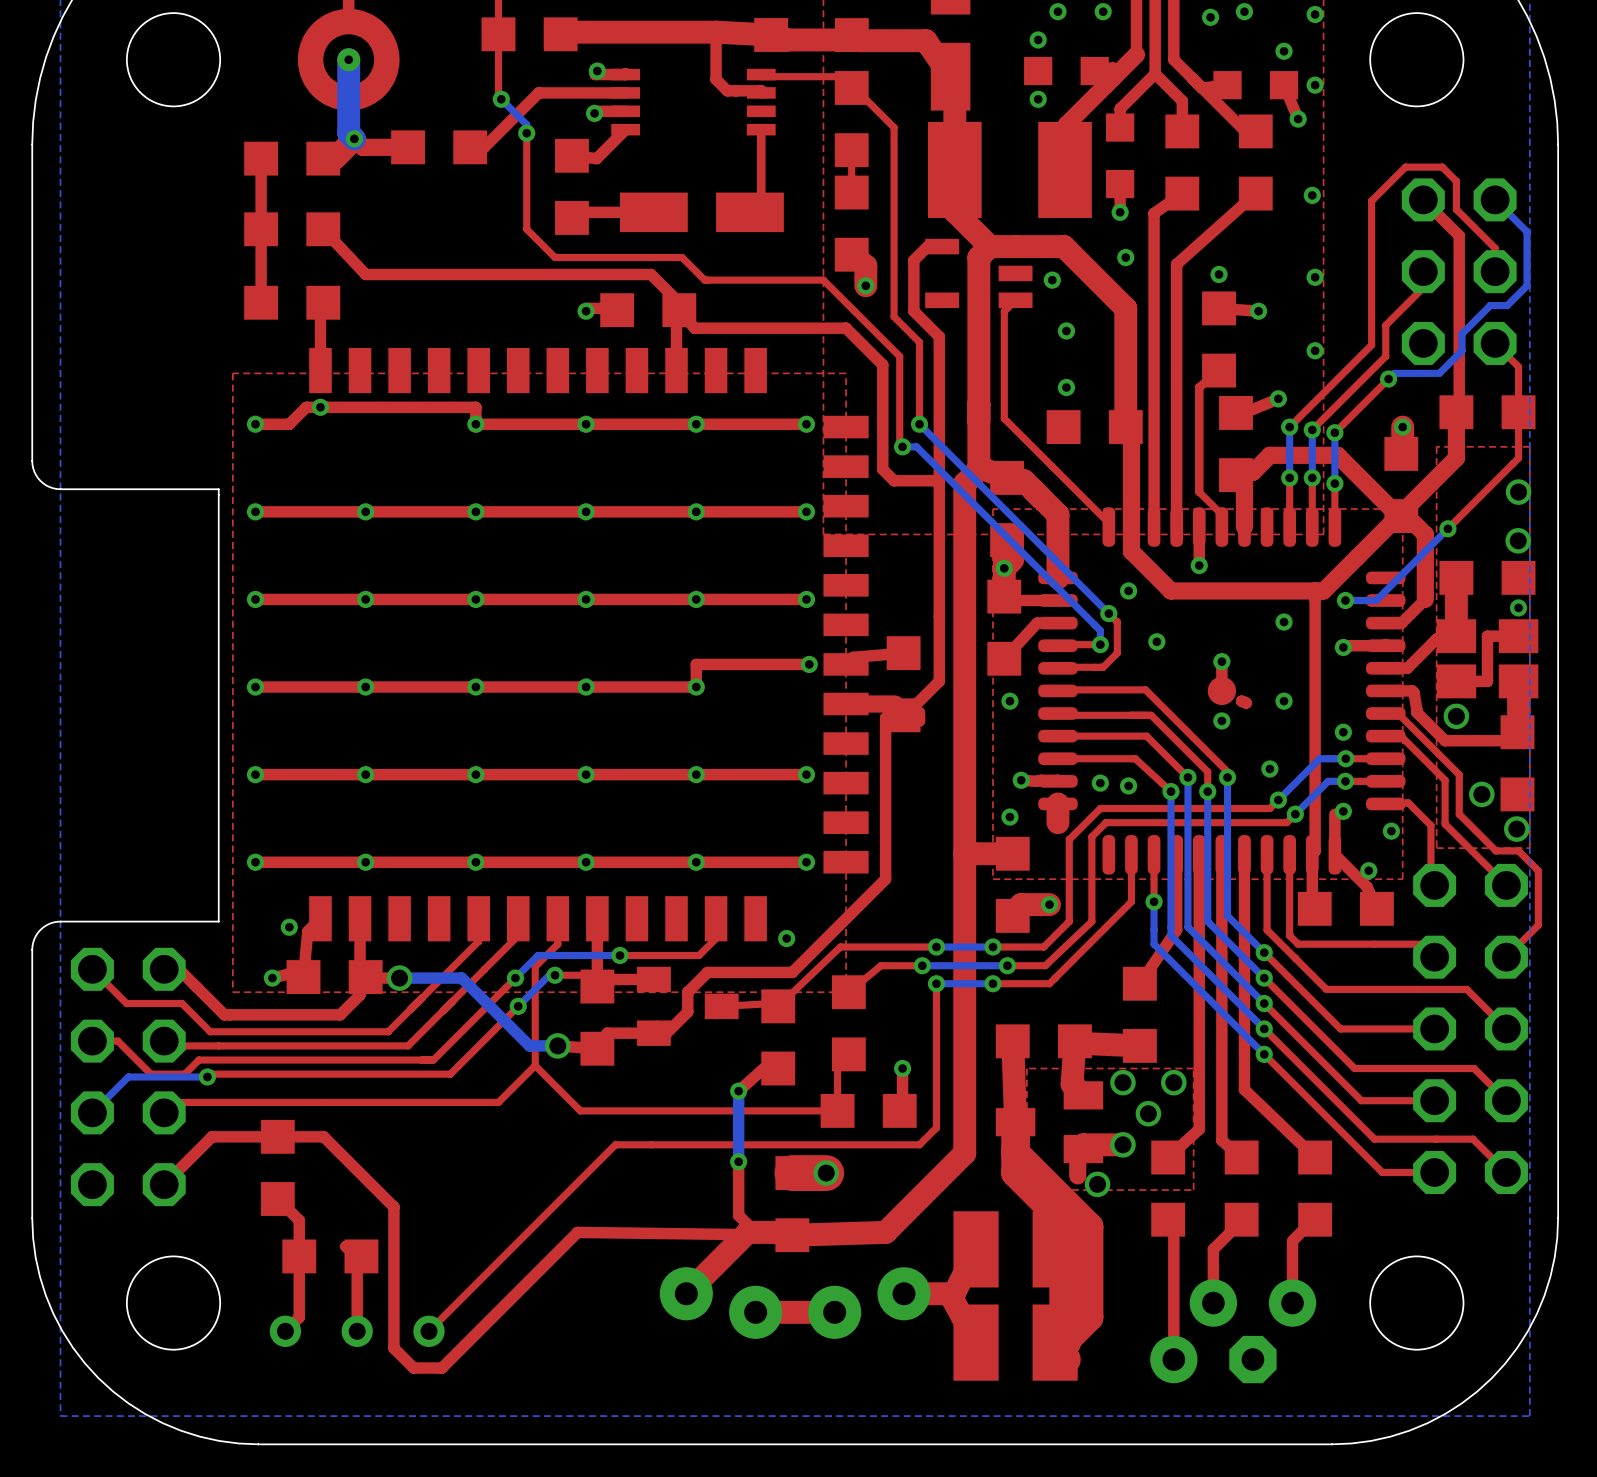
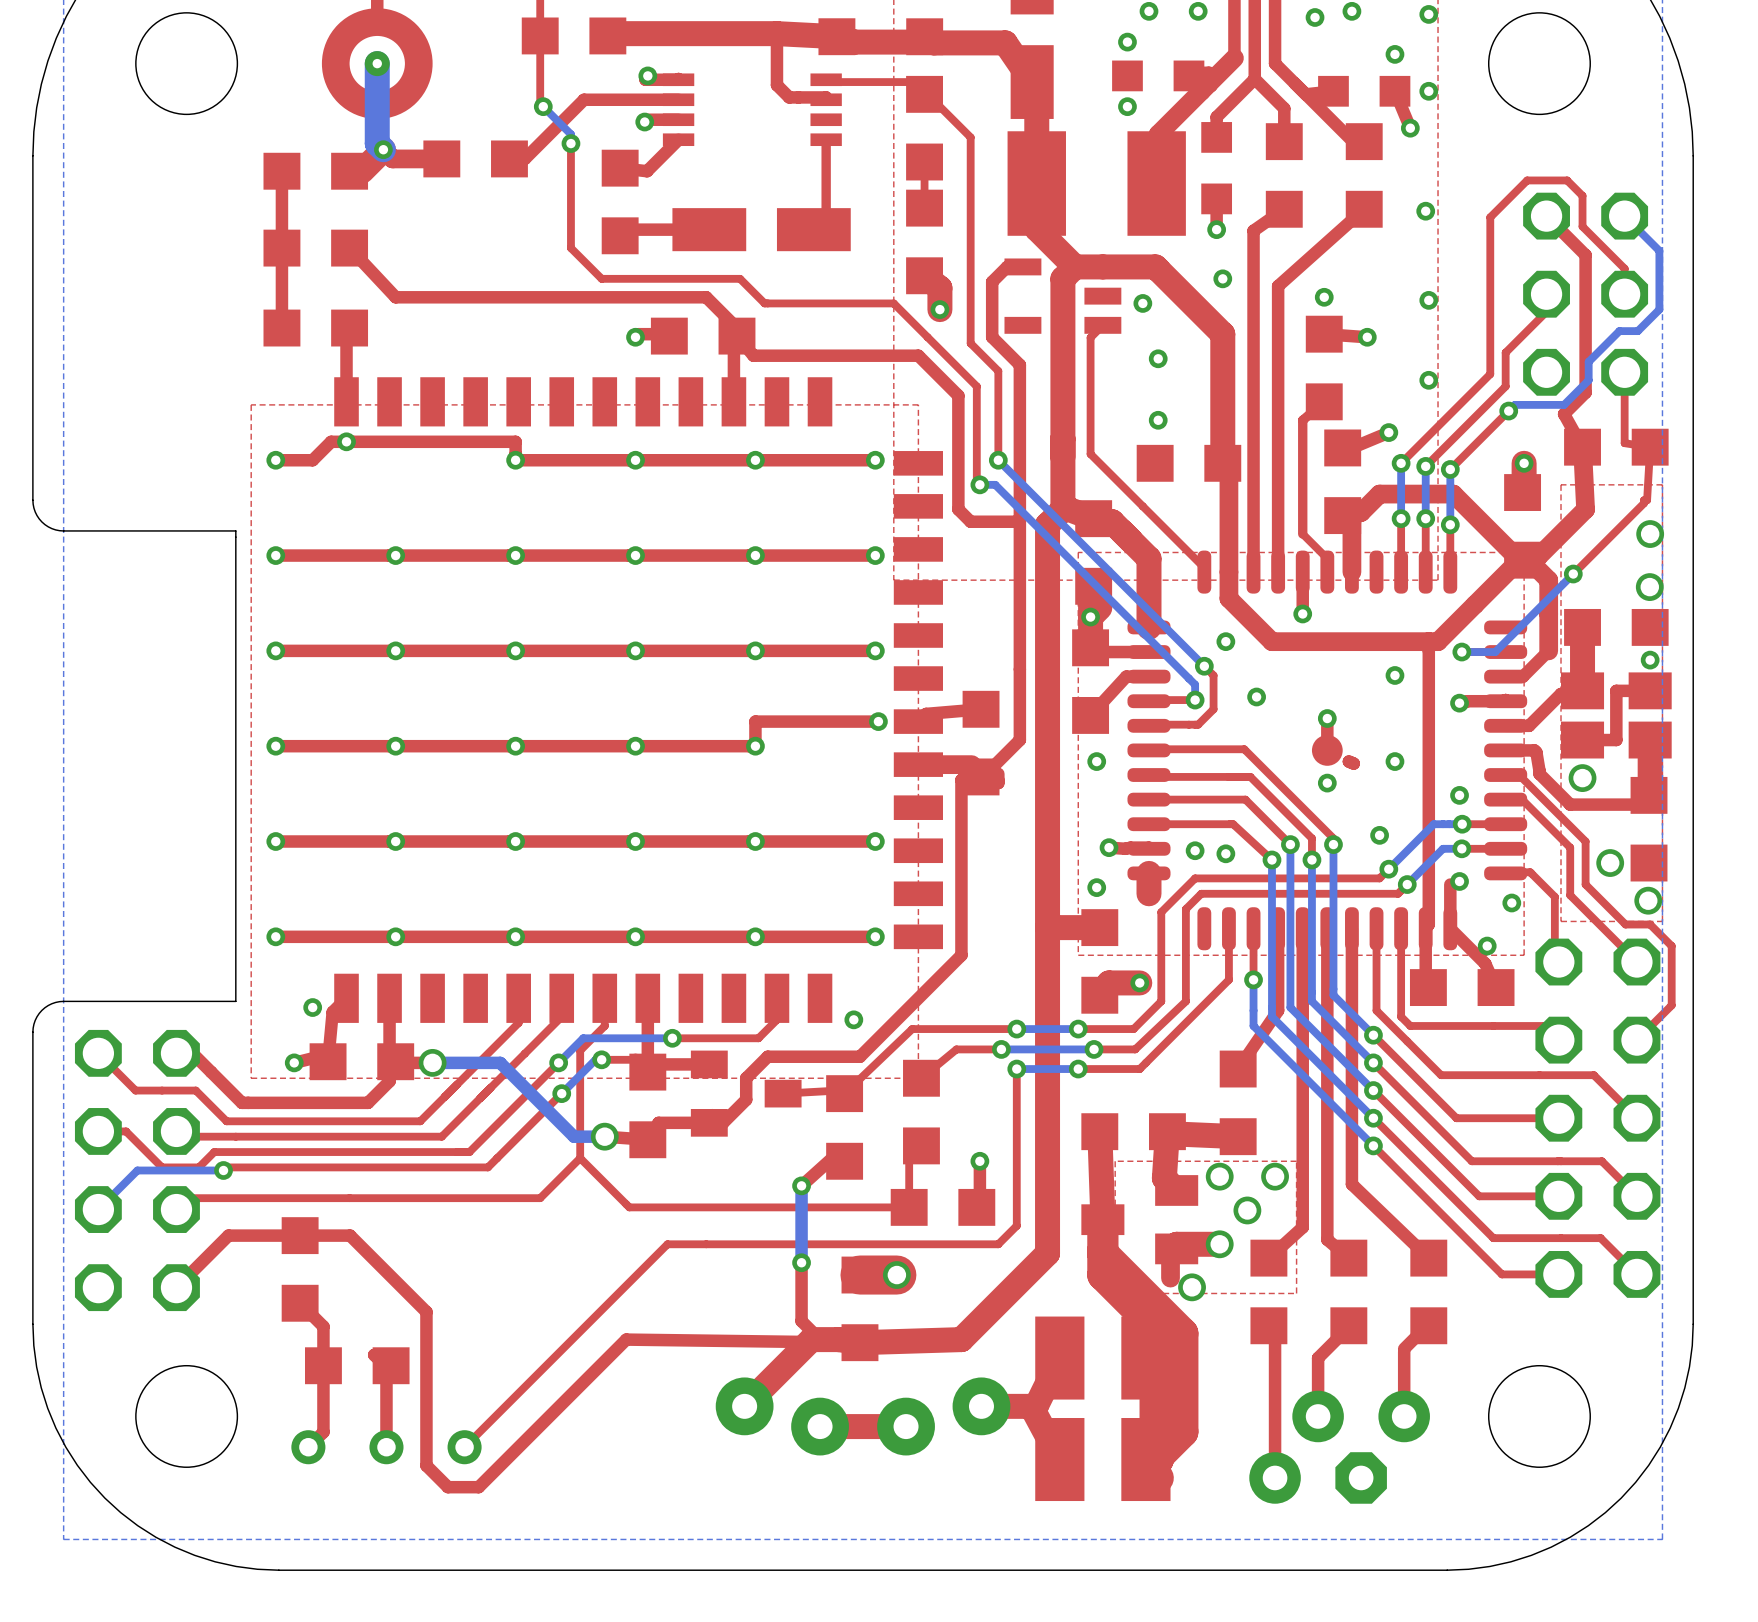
top track: (1495, 343) (1518, 366) (1518, 458) (1512, 463) -> (1624, 372) (1624, 443) (1650, 447) (1647, 500) (1644, 500) (1644, 503)
top track: (1459, 362) (1456, 458) (1401, 513) -> (1585, 392) (1564, 414) (1582, 447) (1585, 509) (1537, 557) (1522, 560)

